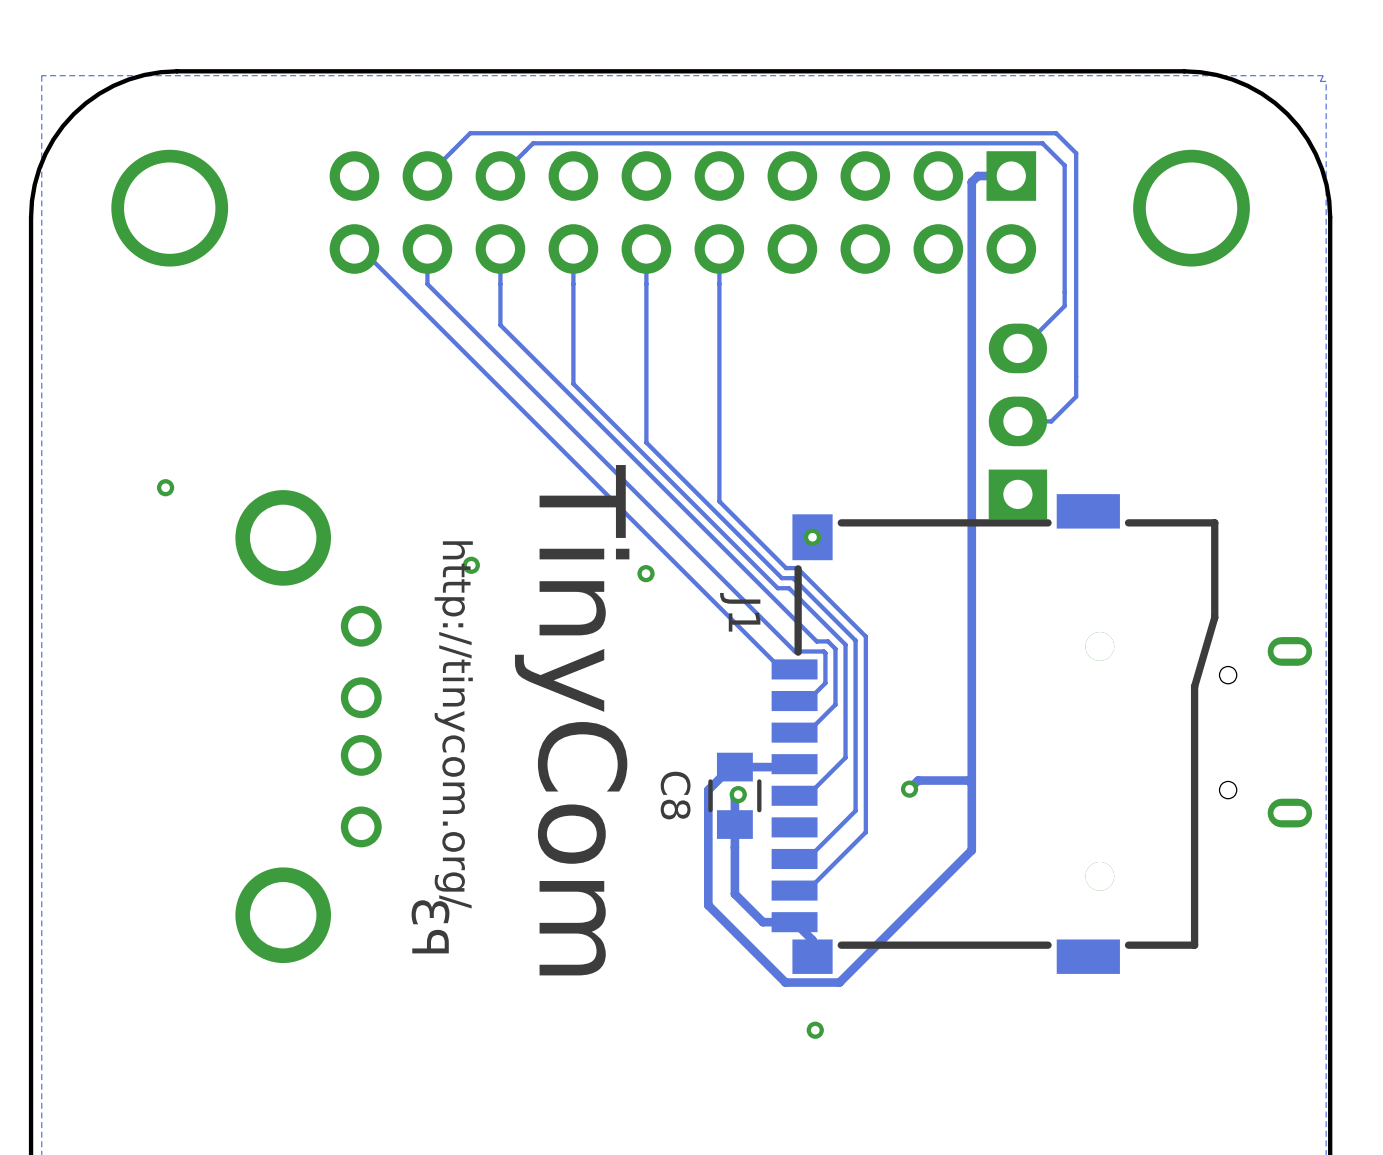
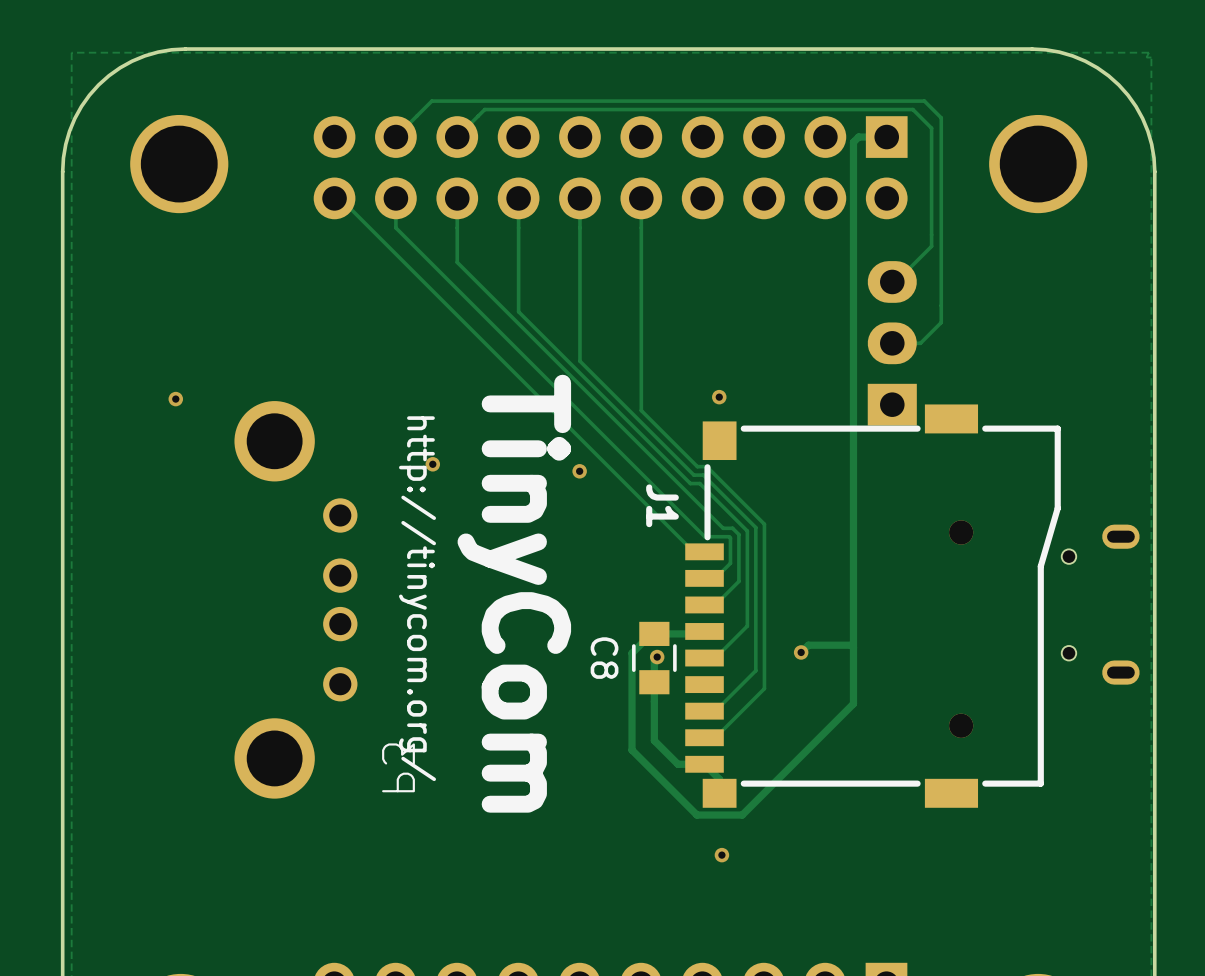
via position: (812, 537) -> (719, 397)

